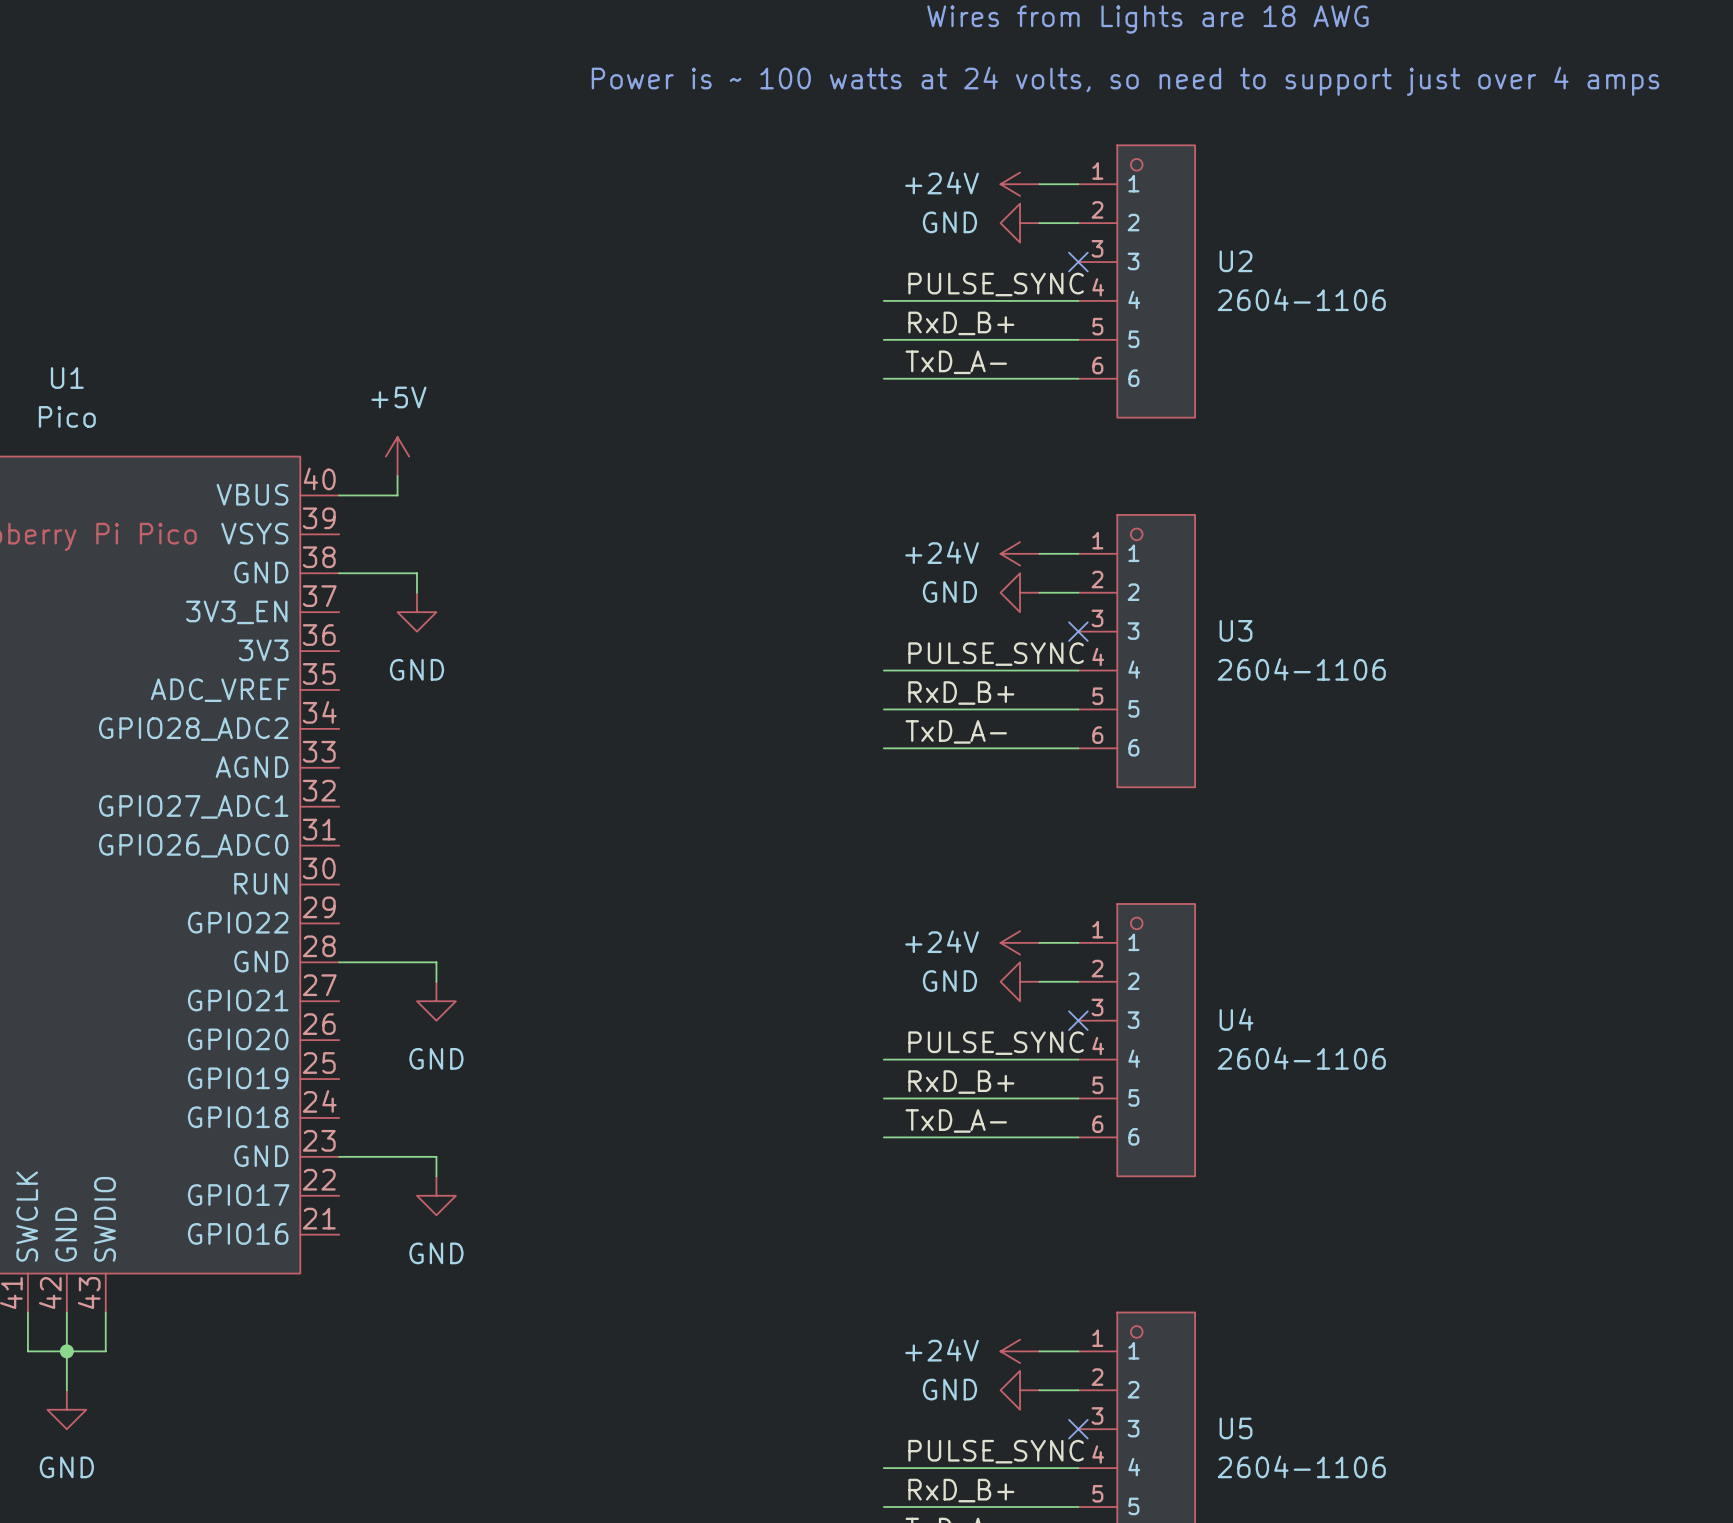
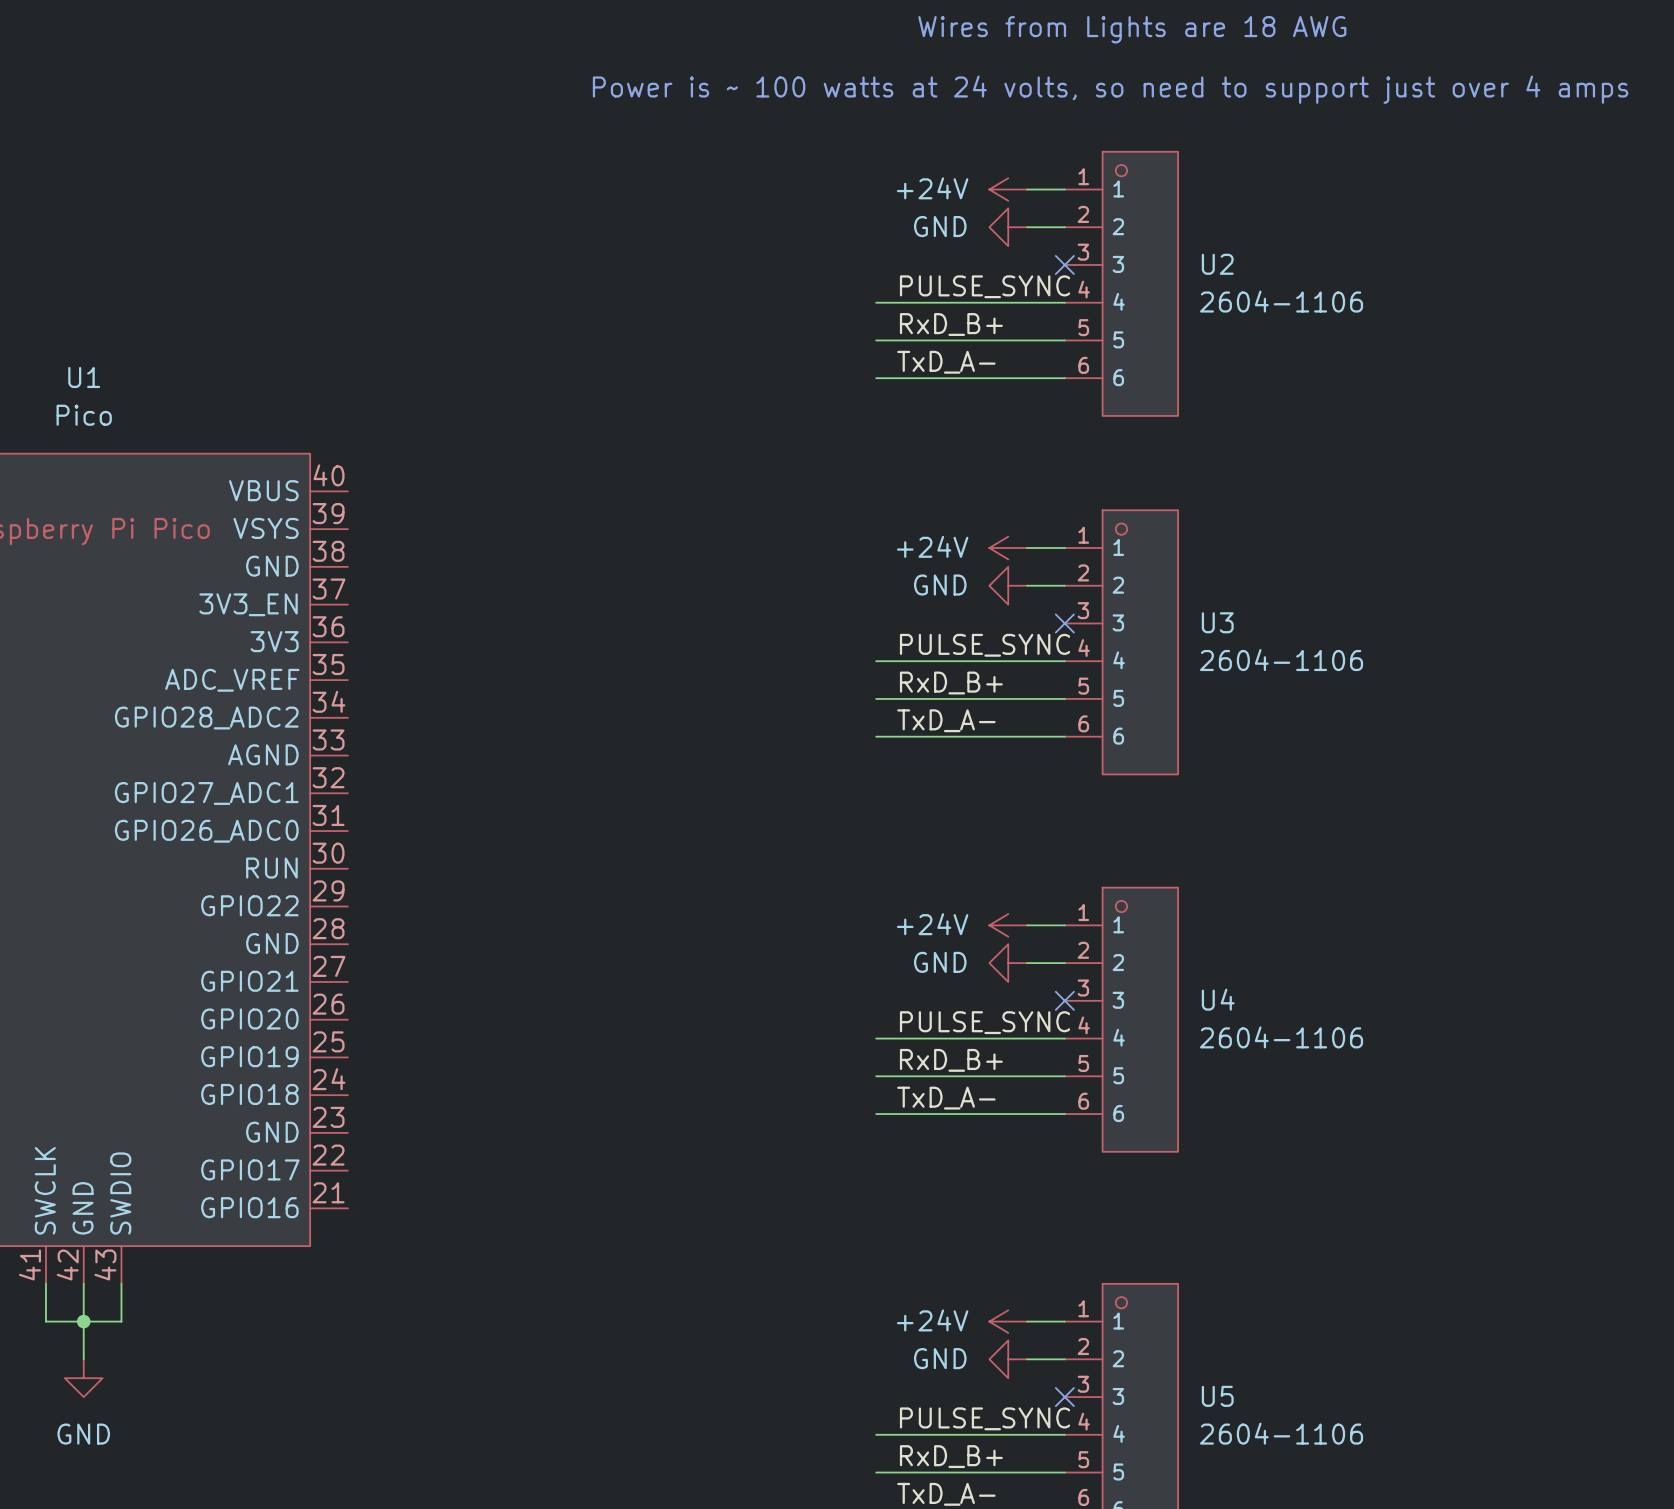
power symbol: +5V (397, 456) -> none
wire: (397, 476) (397, 495) (339, 495) -> none
wire: (339, 573) (416, 573) (416, 592) -> none
power symbol: GND (416, 612) -> none
wire: (339, 962) (436, 962) (436, 981) -> none
power symbol: GND (436, 1001) -> none
wire: (339, 1156) (436, 1156) (436, 1176) -> none
power symbol: GND (436, 1195) -> none

